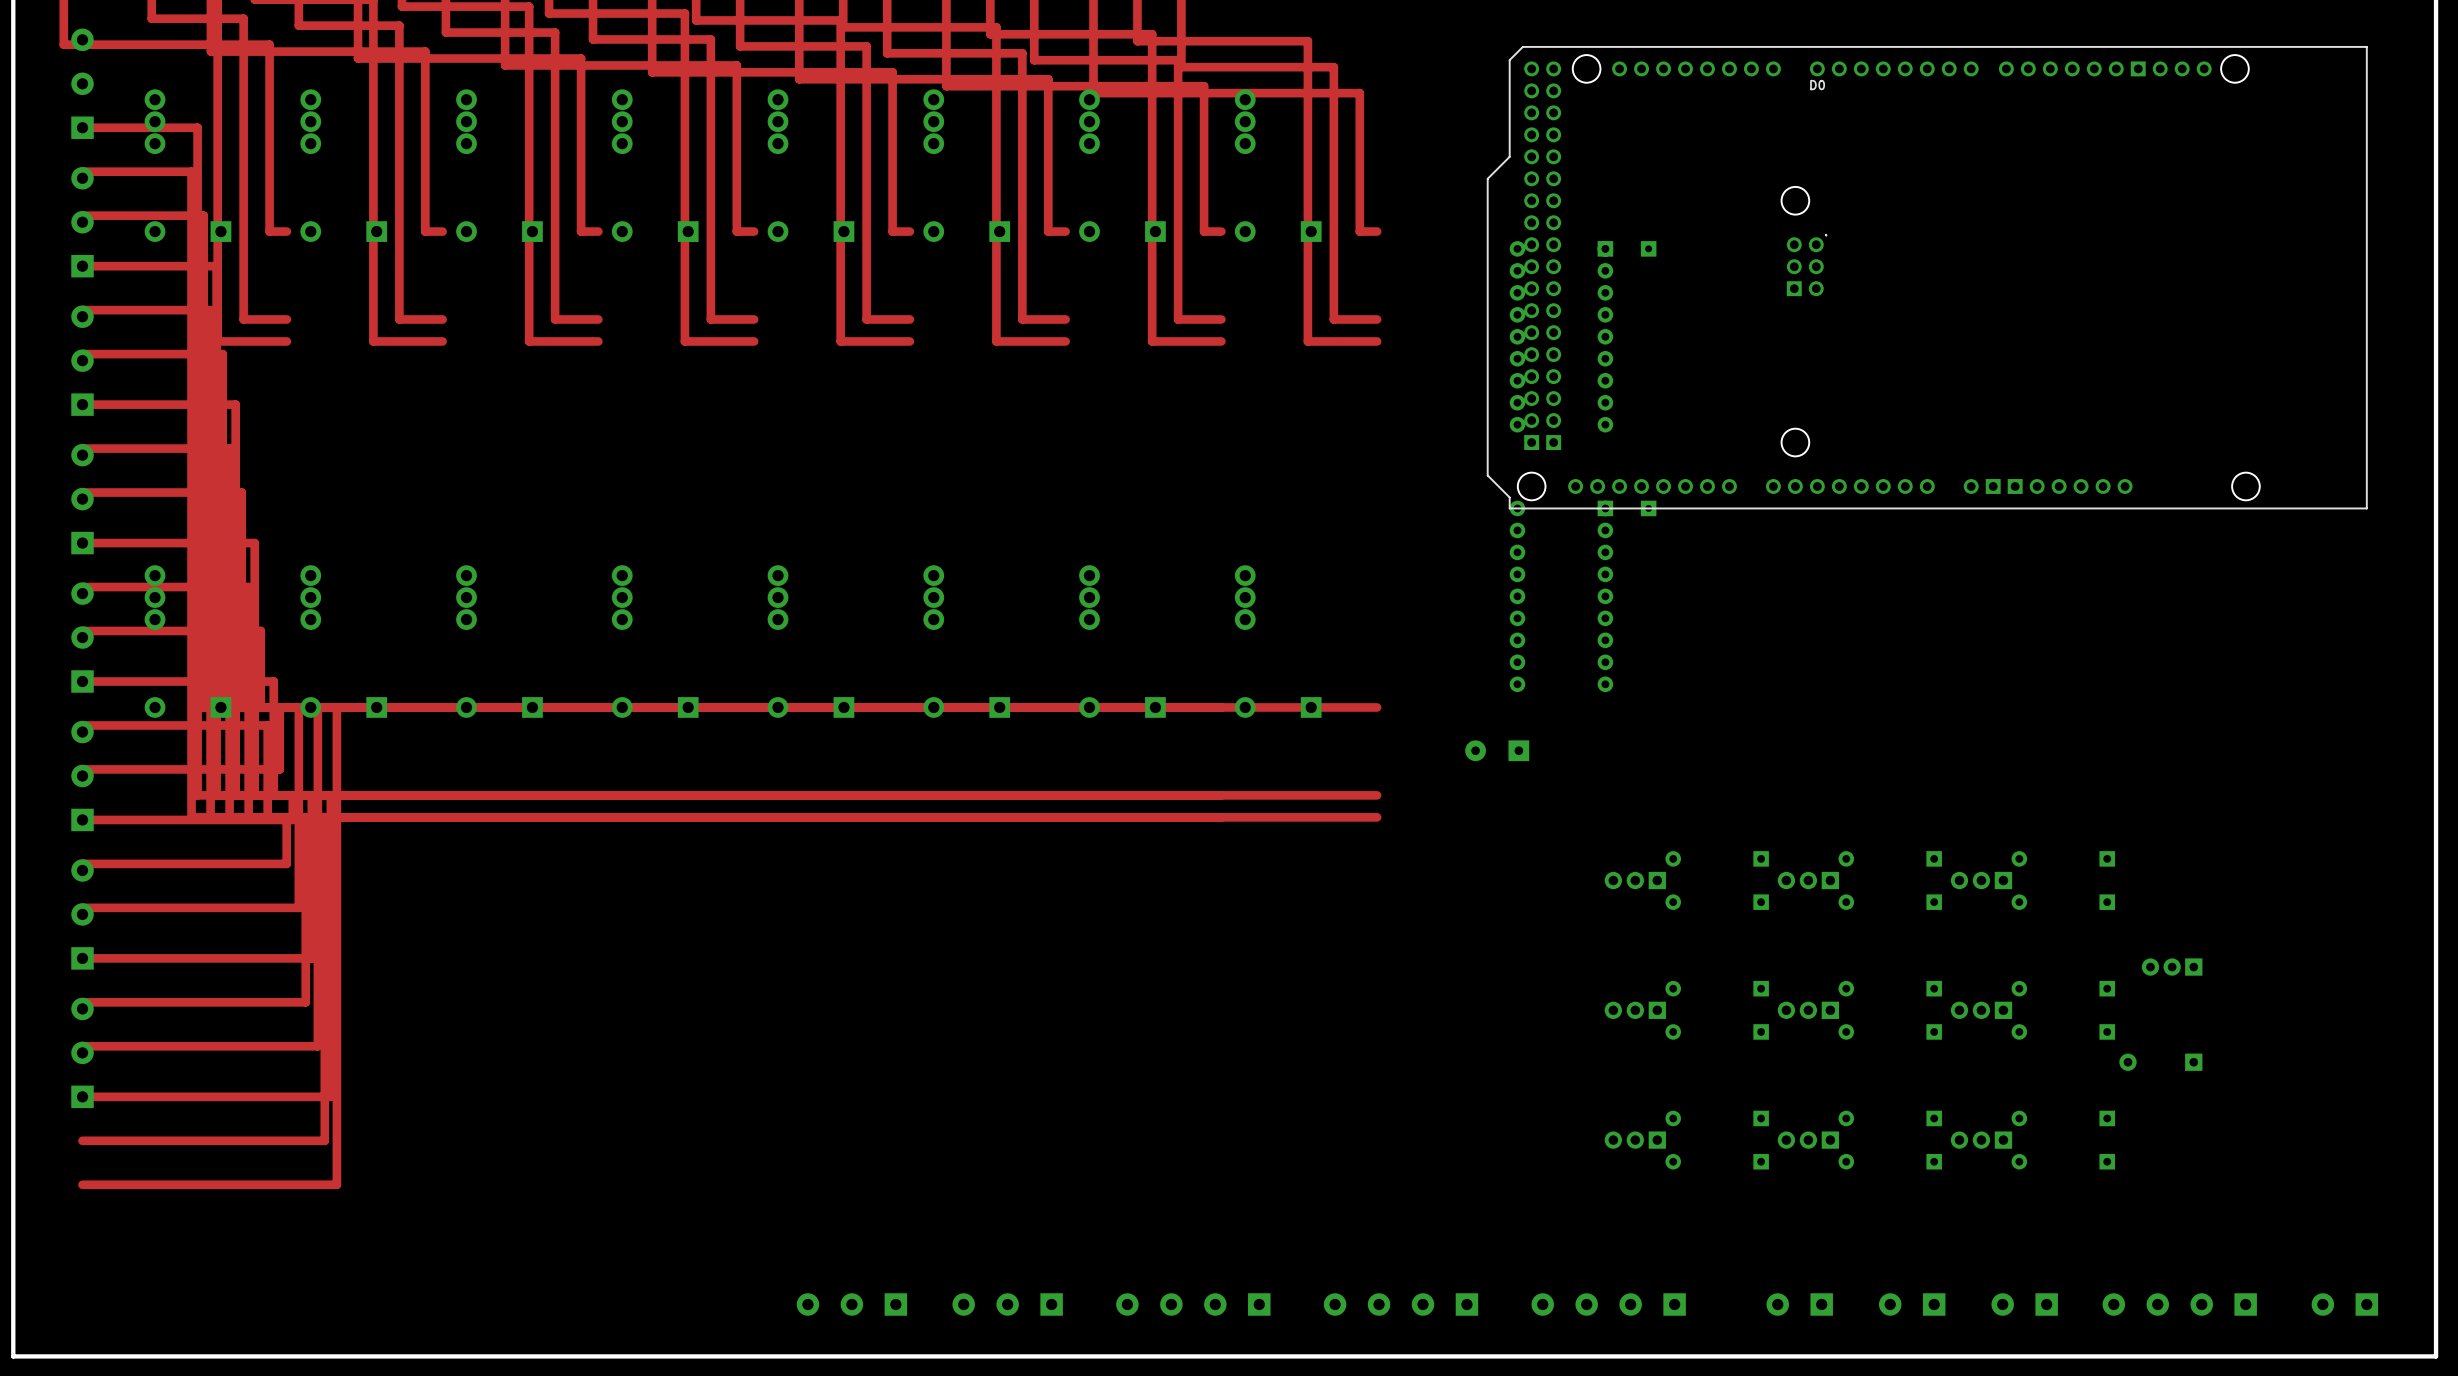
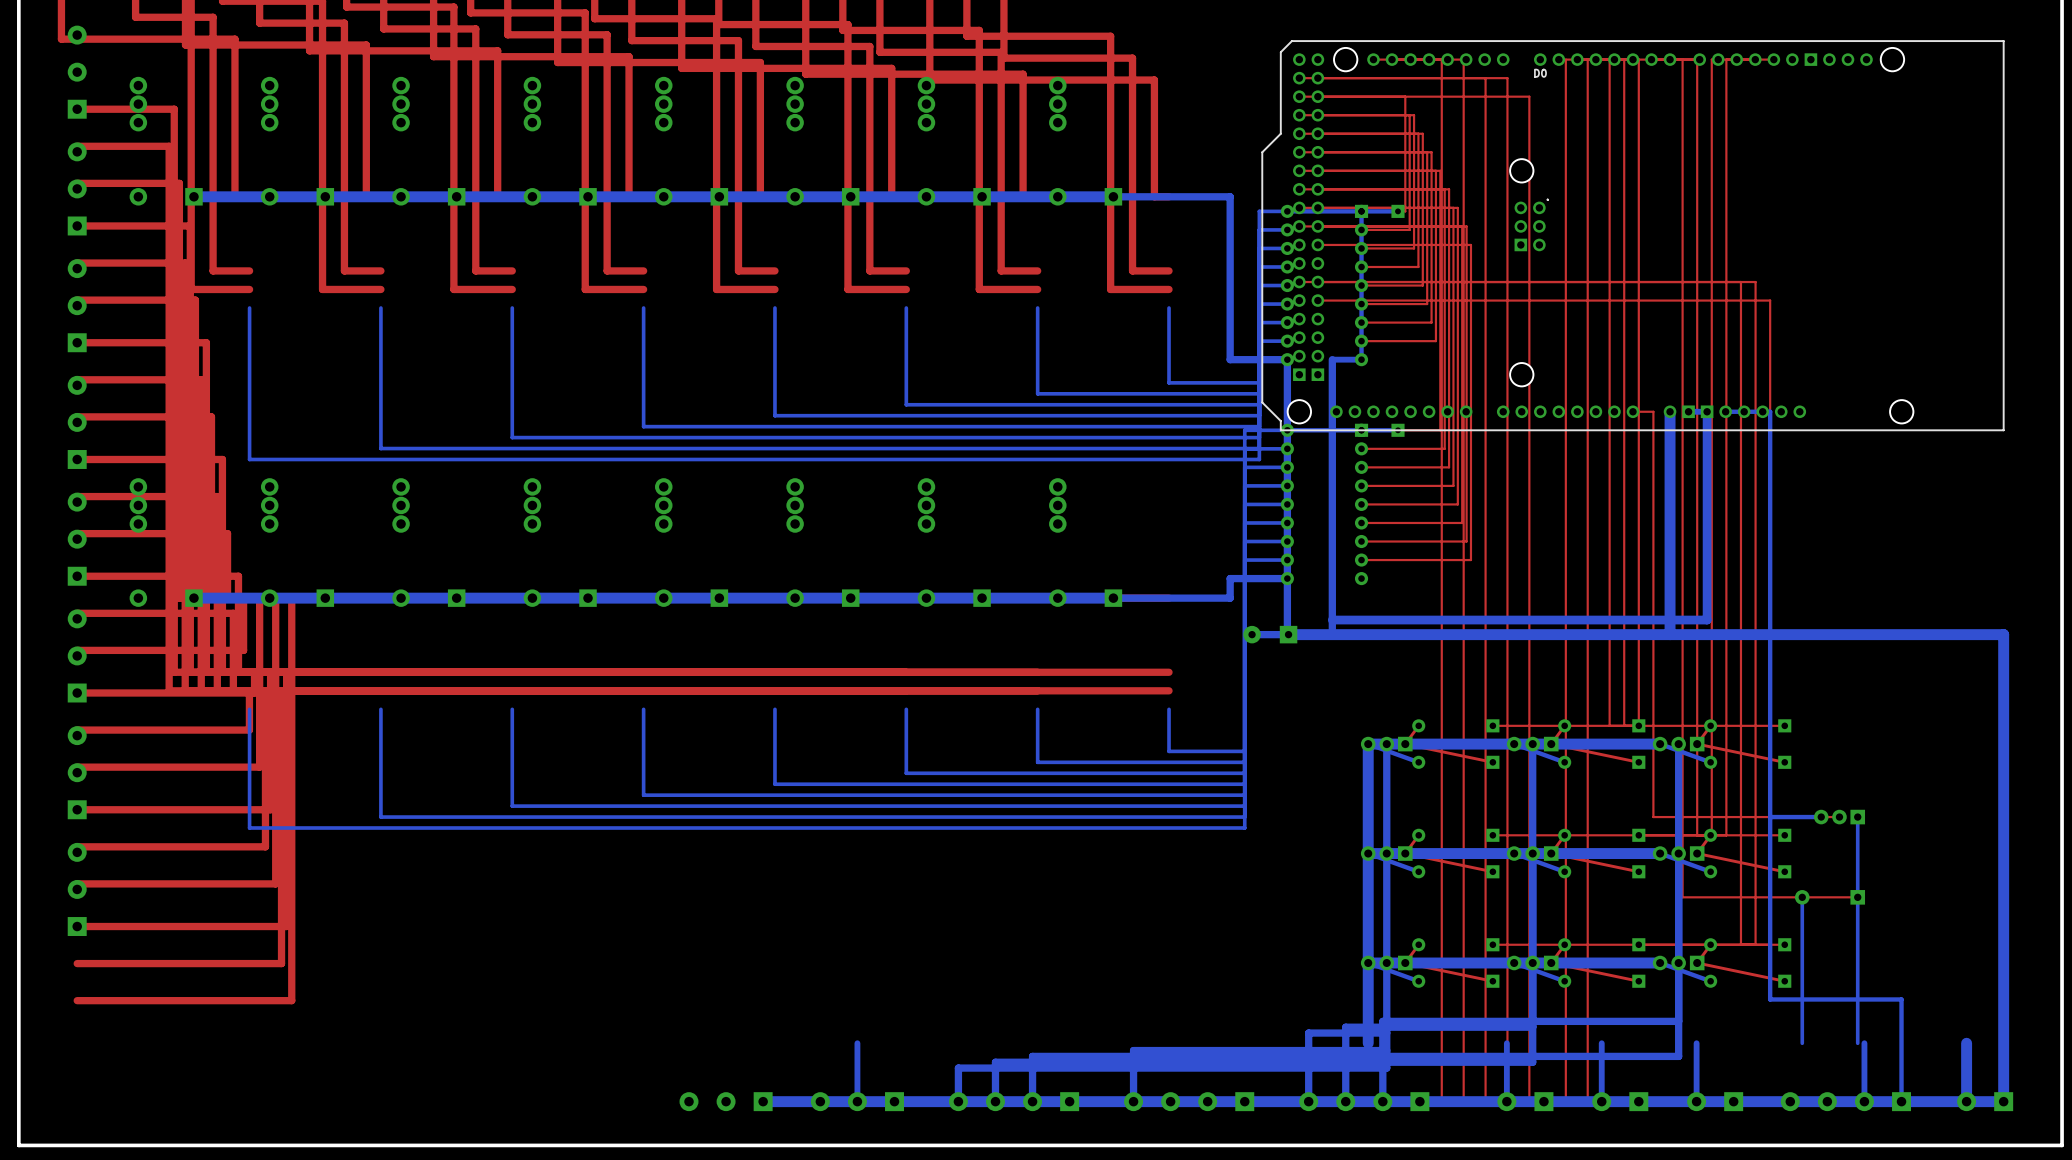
top track: none -> (1373, 59) (1463, 59) (1463, 1101)
top track: none -> (1441, 59) (1441, 1101)
top track: none -> (1587, 59) (1587, 1101)
top track: none -> (1609, 59) (1609, 725)
top track: none -> (1624, 59) (1624, 725)
top track: none -> (1638, 59) (1638, 725)
top track: none -> (1682, 59) (1682, 897) (1857, 897)
top track: none -> (1697, 59) (1697, 835)
top track: none -> (1699, 59) (1565, 59) (1565, 1101)
top track: none -> (1726, 59) (1726, 835)
top track: none -> (1773, 59) (1711, 59) (1711, 835)
top track: none -> (1299, 78) (1507, 78) (1507, 1101)
top track: none -> (1485, 78) (1485, 1101)
top track: none -> (1299, 96) (1529, 96) (1529, 1101)
top track: none -> (1405, 96) (1405, 211) (1361, 211)
top track: none -> (1299, 115) (1414, 115) (1414, 248) (1361, 248)
top track: none -> (1409, 115) (1409, 229) (1361, 229)
top track: none -> (1299, 133) (1422, 133) (1422, 285) (1361, 285)
top track: none -> (1418, 133) (1418, 266) (1361, 266)
top track: none -> (1299, 152) (1431, 152) (1431, 322) (1361, 322)
top track: none -> (1427, 152) (1427, 304) (1361, 304)
top track: none -> (1299, 170) (1440, 170) (1440, 430) (1361, 430)
top track: none -> (1435, 170) (1435, 341) (1361, 341)
top track: none -> (1299, 189) (1449, 189) (1449, 467) (1361, 467)
top track: none -> (1444, 189) (1444, 448) (1361, 448)
bottom track: none -> (193, 196) (1230, 196) (1230, 359) (1287, 359) (1287, 634) (2003, 634) (2003, 1101) (763, 1101)
top track: none -> (1299, 207) (1457, 207) (1457, 504) (1361, 504)
top track: none -> (1453, 207) (1453, 485) (1361, 485)
bottom track: none -> (1361, 211) (1361, 359) (1332, 359) (1332, 634) (1252, 634)
bottom track: none -> (1398, 211) (1259, 211) (1259, 459) (249, 459) (249, 308)
top track: none -> (1299, 226) (1466, 226) (1466, 541) (1361, 541)
top track: none -> (1462, 226) (1462, 522) (1361, 522)
bottom track: none -> (1287, 229) (1259, 229)
top track: none -> (1317, 244) (1470, 244) (1470, 560) (1361, 560)
bottom track: none -> (1287, 248) (1259, 248)
bottom track: none -> (1287, 266) (1259, 266)
top track: none -> (1299, 282) (1755, 282) (1755, 944)
top track: none -> (1740, 282) (1740, 944)
bottom track: none -> (1287, 285) (1259, 285)
top track: none -> (1317, 300) (1770, 300) (1770, 944)
bottom track: none -> (1287, 304) (1259, 304)
bottom track: none -> (380, 308) (380, 448) (1259, 448)
bottom track: none -> (512, 308) (512, 437) (1259, 437)
bottom track: none -> (643, 308) (643, 426) (1259, 426)
bottom track: none -> (774, 308) (774, 415) (1259, 415)
bottom track: none -> (906, 308) (906, 404) (1259, 404)
bottom track: none -> (1037, 308) (1037, 393) (1259, 393)
bottom track: none -> (1169, 308) (1169, 382) (1259, 382)
bottom track: none -> (1287, 322) (1259, 322)
bottom track: none -> (1287, 341) (1259, 341)
top track: none -> (1632, 411) (1653, 411) (1653, 817) (1839, 817)
bottom track: none -> (1670, 411) (1670, 634)
bottom track: none -> (1688, 411) (1707, 411) (1707, 620) (1332, 620)
bottom track: none -> (1725, 411) (1770, 411) (1770, 999) (1901, 999) (1901, 1101)
bottom track: none -> (1398, 430) (1244, 430) (1244, 828) (249, 828) (249, 709)
bottom track: none -> (1287, 448) (1244, 448)
bottom track: none -> (1287, 467) (1244, 467)
bottom track: none -> (1287, 485) (1244, 485)
bottom track: none -> (1287, 504) (1244, 504)
bottom track: none -> (1287, 522) (1244, 522)
bottom track: none -> (1287, 541) (1244, 541)
bottom track: none -> (1287, 560) (1244, 560)
bottom track: none -> (1287, 578) (1230, 578) (1230, 598) (193, 598)
bottom track: none -> (380, 709) (380, 817) (1244, 817)
bottom track: none -> (512, 709) (512, 806) (1244, 806)
bottom track: none -> (643, 709) (643, 795) (1244, 795)
bottom track: none -> (774, 709) (774, 784) (1244, 784)
bottom track: none -> (906, 709) (906, 773) (1244, 773)
bottom track: none -> (1037, 709) (1037, 762) (1244, 762)
bottom track: none -> (1169, 709) (1169, 751) (1244, 751)
top track: none -> (1418, 725) (1405, 744) (1492, 762)
top track: none -> (1564, 725) (1551, 744) (1638, 762)
top track: none -> (1710, 725) (1697, 744) (1784, 762)
top track: none -> (1784, 725) (1492, 725)
bottom track: none -> (1368, 744) (1418, 762)
bottom track: none -> (1368, 744) (1660, 744) (1710, 762)
bottom track: none -> (1368, 744) (1368, 1043)
bottom track: none -> (1386, 744) (1386, 1068) (958, 1068) (958, 1101)
bottom track: none -> (1514, 744) (1564, 762)
bottom track: none -> (1532, 744) (1532, 1062) (995, 1062) (995, 1101)
bottom track: none -> (1678, 744) (1678, 1056) (1032, 1056) (1032, 1101)
bottom track: none -> (1821, 817) (1770, 817)
bottom track: none -> (1857, 817) (1857, 1043)
top track: none -> (1418, 835) (1405, 853) (1492, 871)
top track: none -> (1564, 835) (1551, 853) (1638, 871)
top track: none -> (1710, 835) (1697, 853) (1784, 871)
top track: none -> (1784, 835) (1492, 835)
bottom track: none -> (1514, 853) (1564, 871)
bottom track: none -> (1710, 871) (1660, 853) (1368, 853) (1418, 871)
bottom track: none -> (1802, 897) (1802, 1043)
top track: none -> (1418, 944) (1405, 963) (1492, 981)
top track: none -> (1564, 944) (1551, 963) (1638, 981)
top track: none -> (1710, 944) (1697, 963) (1784, 981)
top track: none -> (1784, 944) (1492, 944)
bottom track: none -> (1514, 963) (1564, 981)
bottom track: none -> (1710, 981) (1660, 963) (1368, 963) (1418, 981)
bottom track: none -> (1678, 1021) (1382, 1021) (1382, 1101)
bottom track: none -> (1532, 1027) (1345, 1027) (1345, 1101)
bottom track: none -> (1386, 1033) (1308, 1033) (1308, 1101)
bottom track: none -> (857, 1043) (857, 1101)
bottom track: none -> (1506, 1043) (1506, 1101)
bottom track: none -> (1601, 1043) (1601, 1101)
bottom track: none -> (1696, 1043) (1696, 1101)
bottom track: none -> (1864, 1043) (1864, 1101)
bottom track: none -> (1966, 1043) (1966, 1101)
bottom track: none -> (1386, 1050) (1133, 1050) (1133, 1101)

